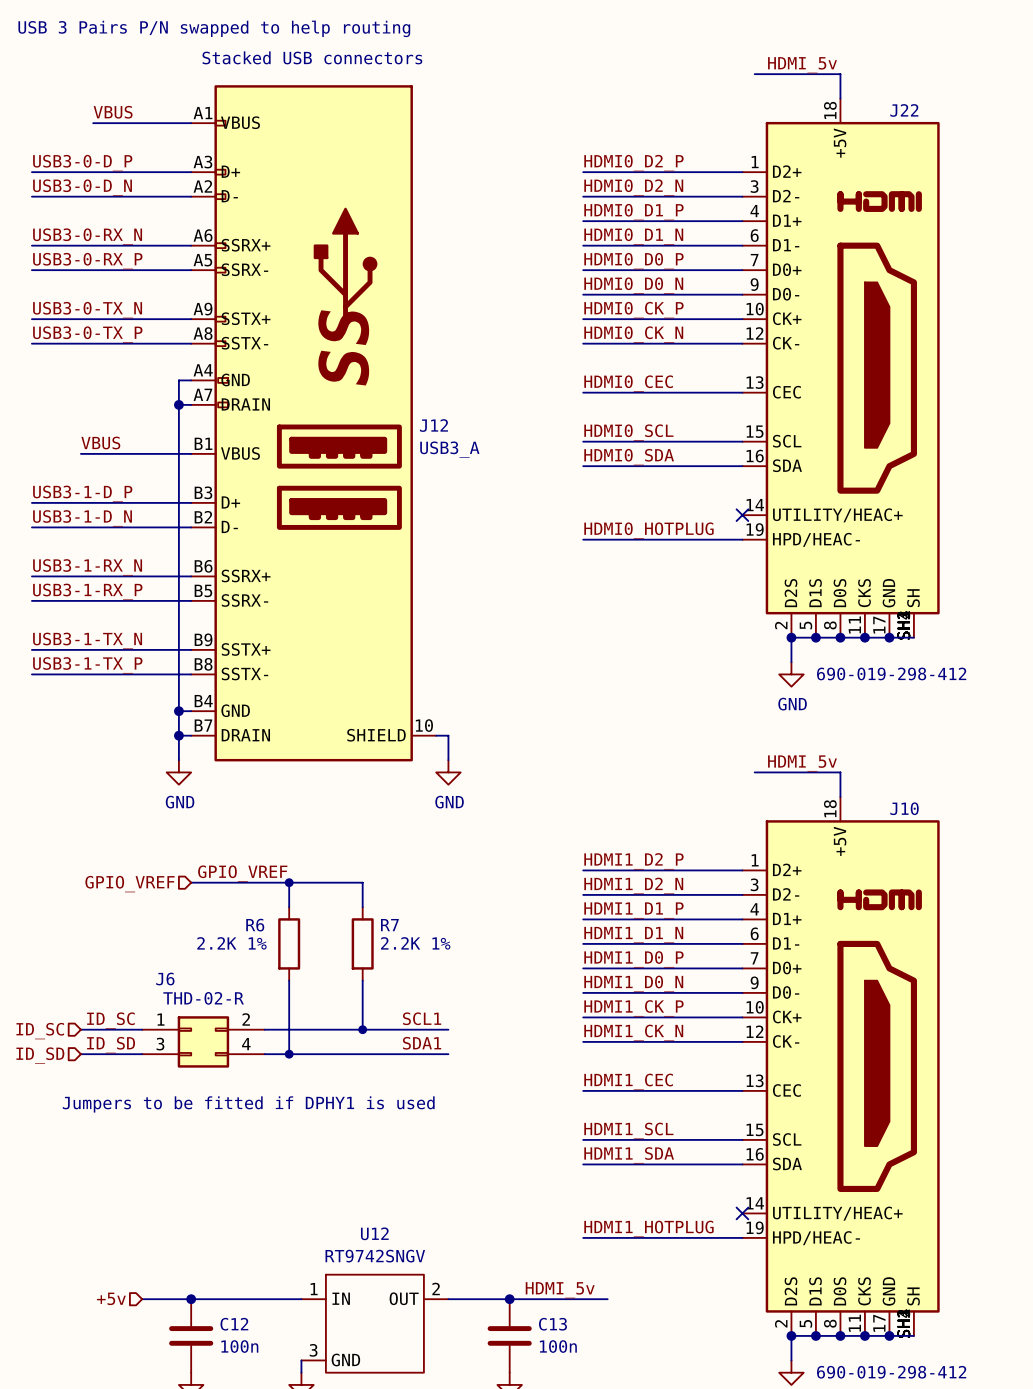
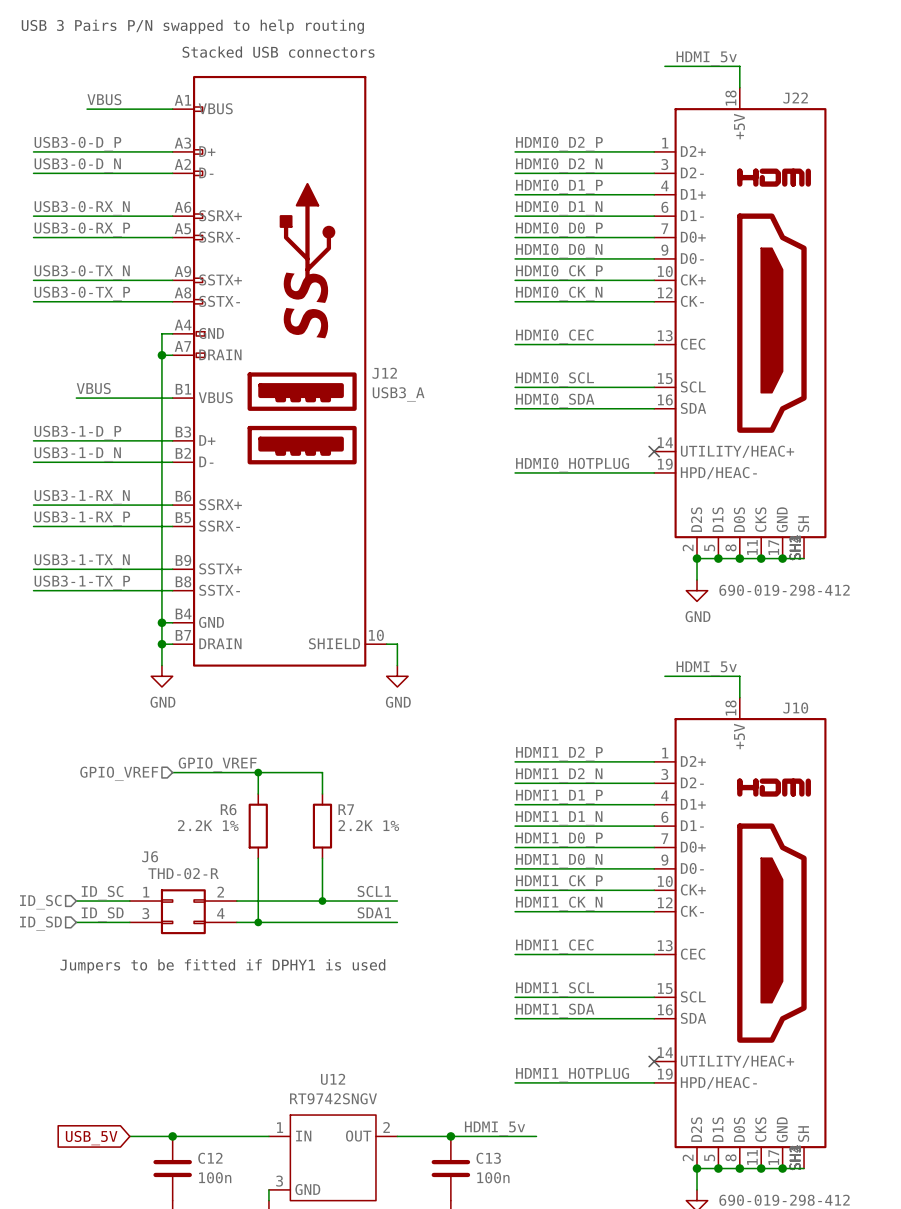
hierarchical label: +5v (111, 1298) -> none
global label: none -> USB_5V (91, 1138)

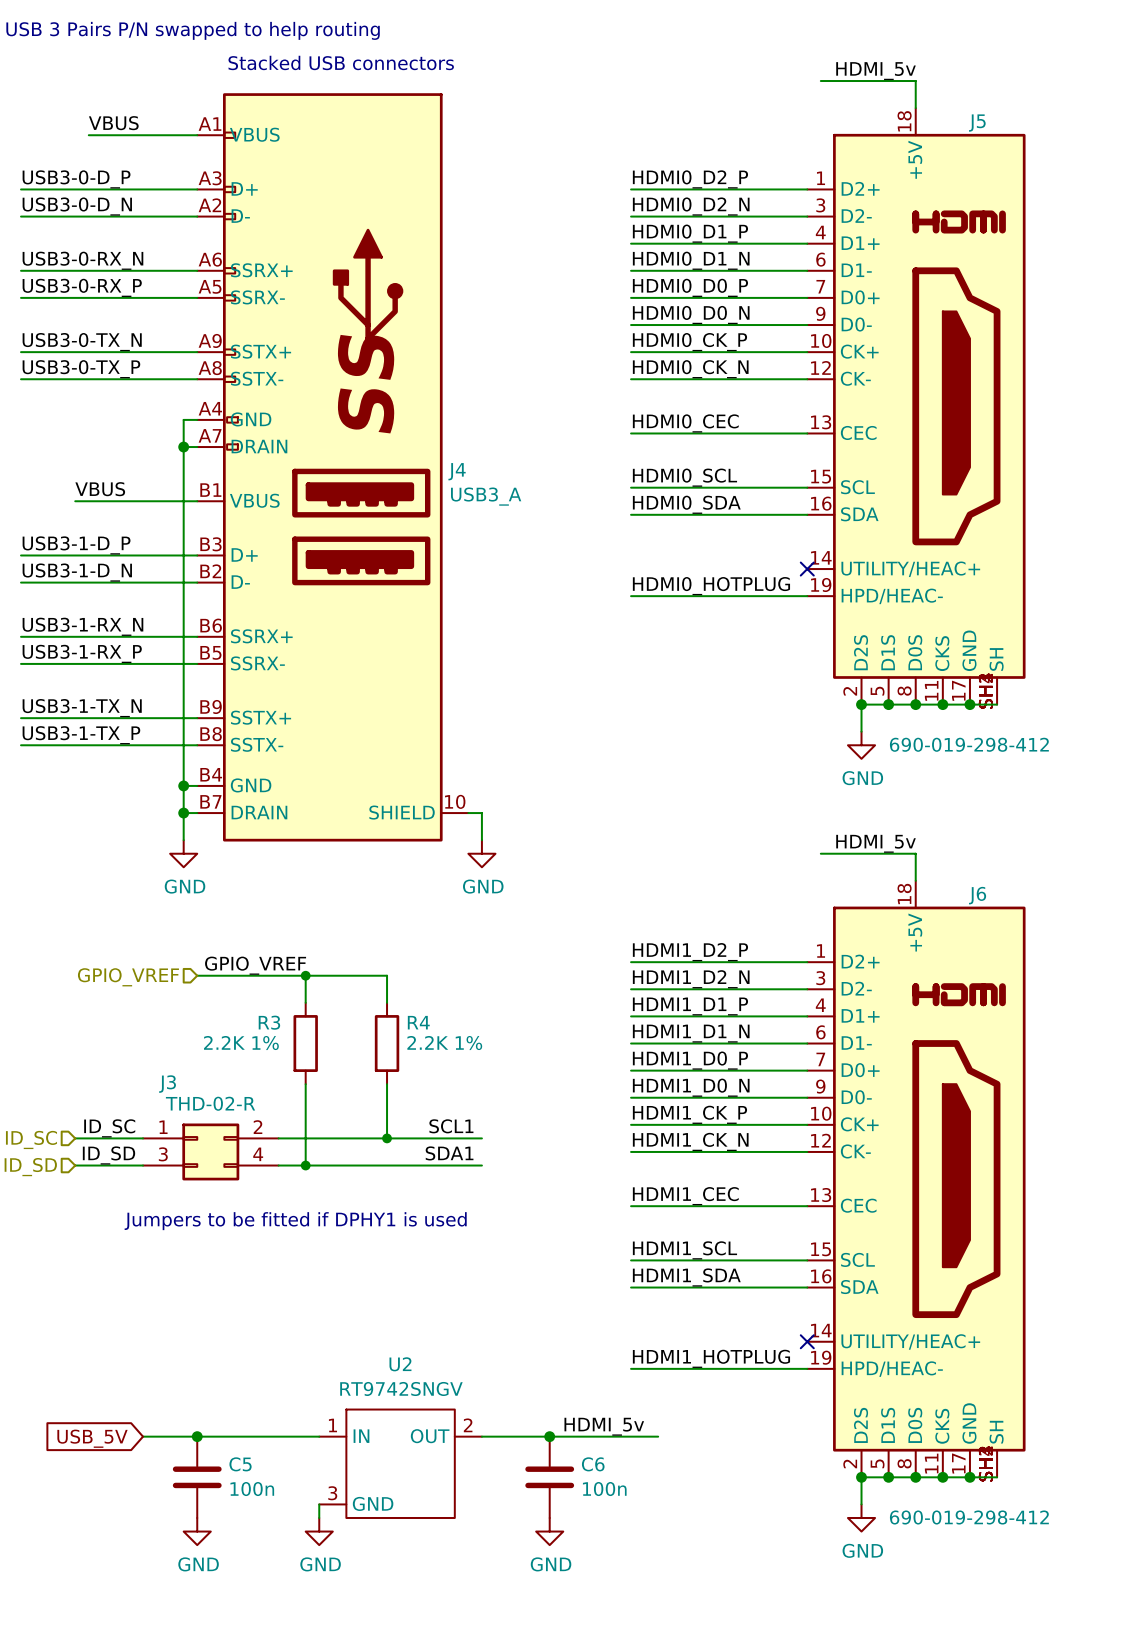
J22 name: J22 (795, 98) -> J5 (977, 123)
J12 name: J12 (384, 373) -> J4 (457, 471)
J10 name: J10 (795, 708) -> J6 (977, 895)
R6 name: R6 (228, 809) -> R3 (269, 1022)
R7 name: R7 (346, 809) -> R4 (418, 1022)
J6 name: J6 (150, 856) -> J3 (167, 1084)
U12 name: U12 (333, 1079) -> U2 (400, 1364)
C12 name: C12 (210, 1158) -> C5 (240, 1464)
C13 name: C13 (488, 1158) -> C6 (593, 1464)

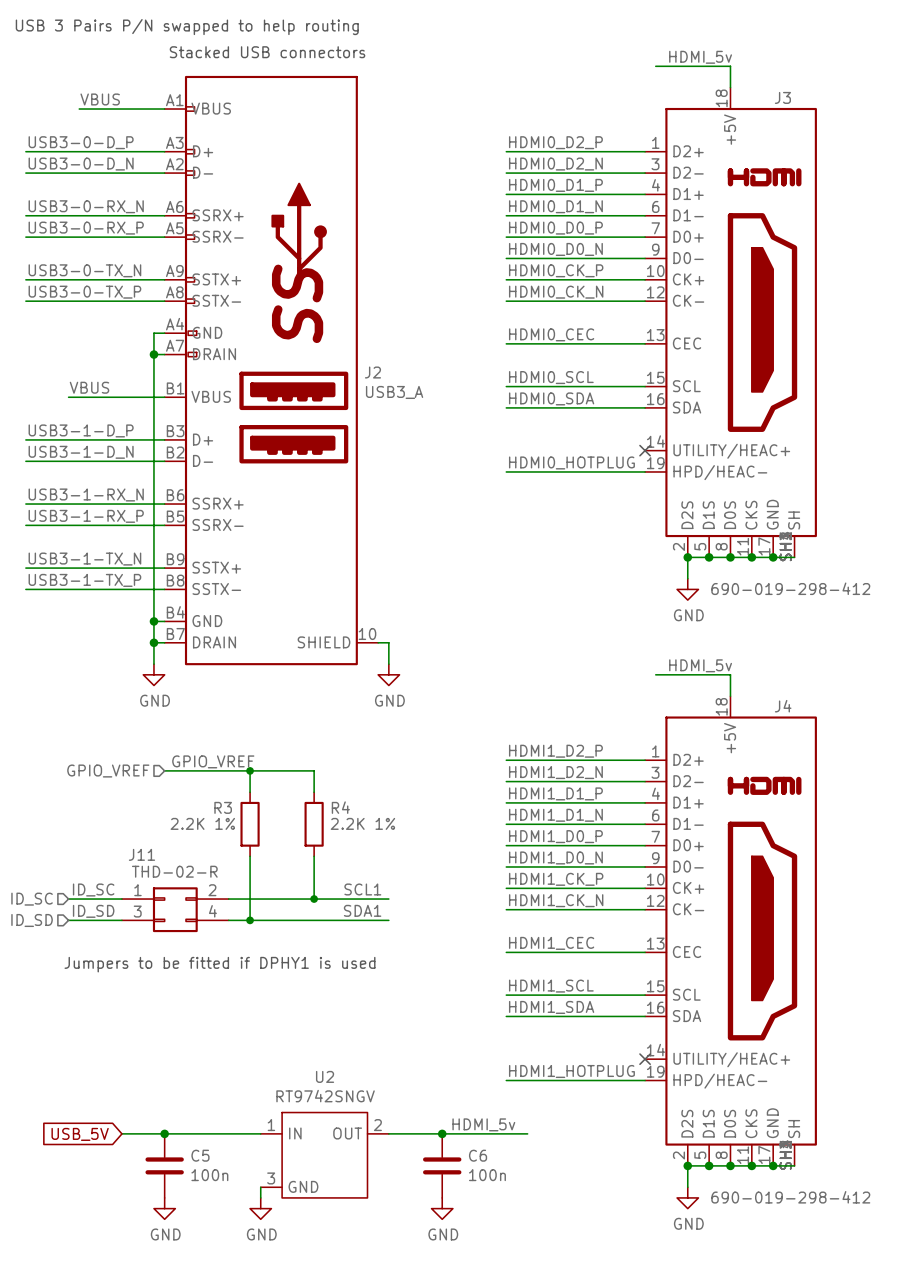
J5 name: J5 (977, 123) -> J3 (782, 97)
J4 name: J4 (457, 471) -> J2 (372, 372)
J6 name: J6 (977, 895) -> J4 (783, 706)
J3 name: J3 (167, 1084) -> J11 (141, 854)

